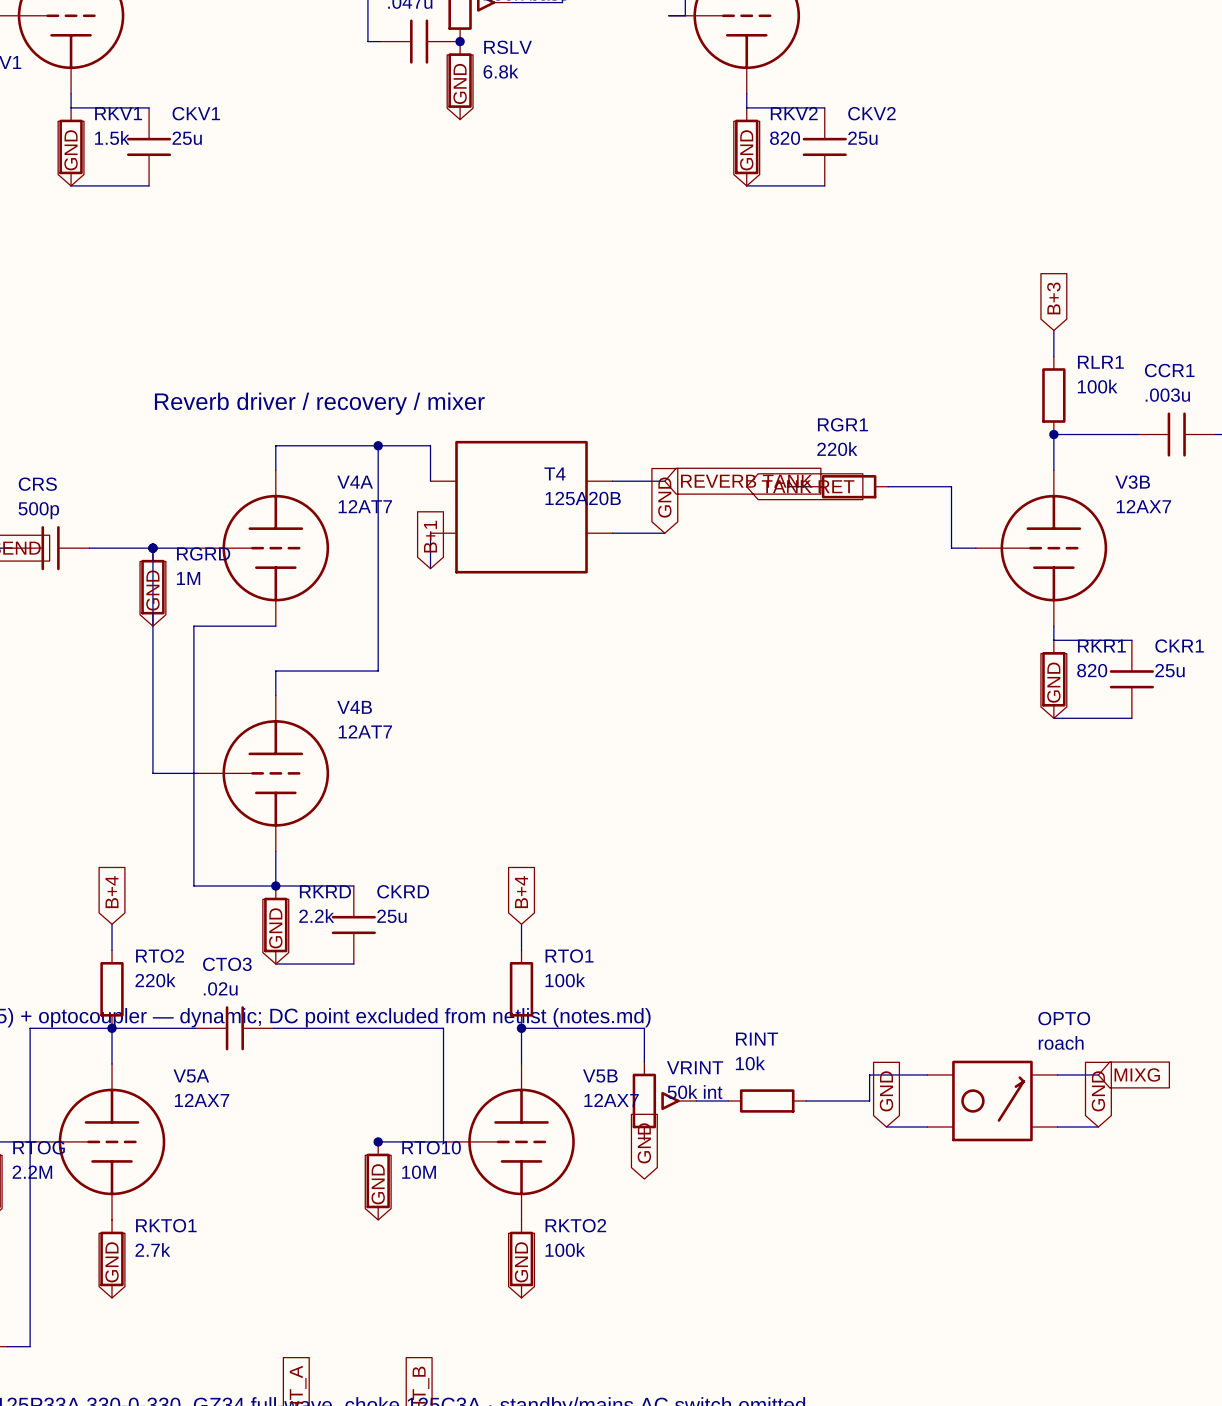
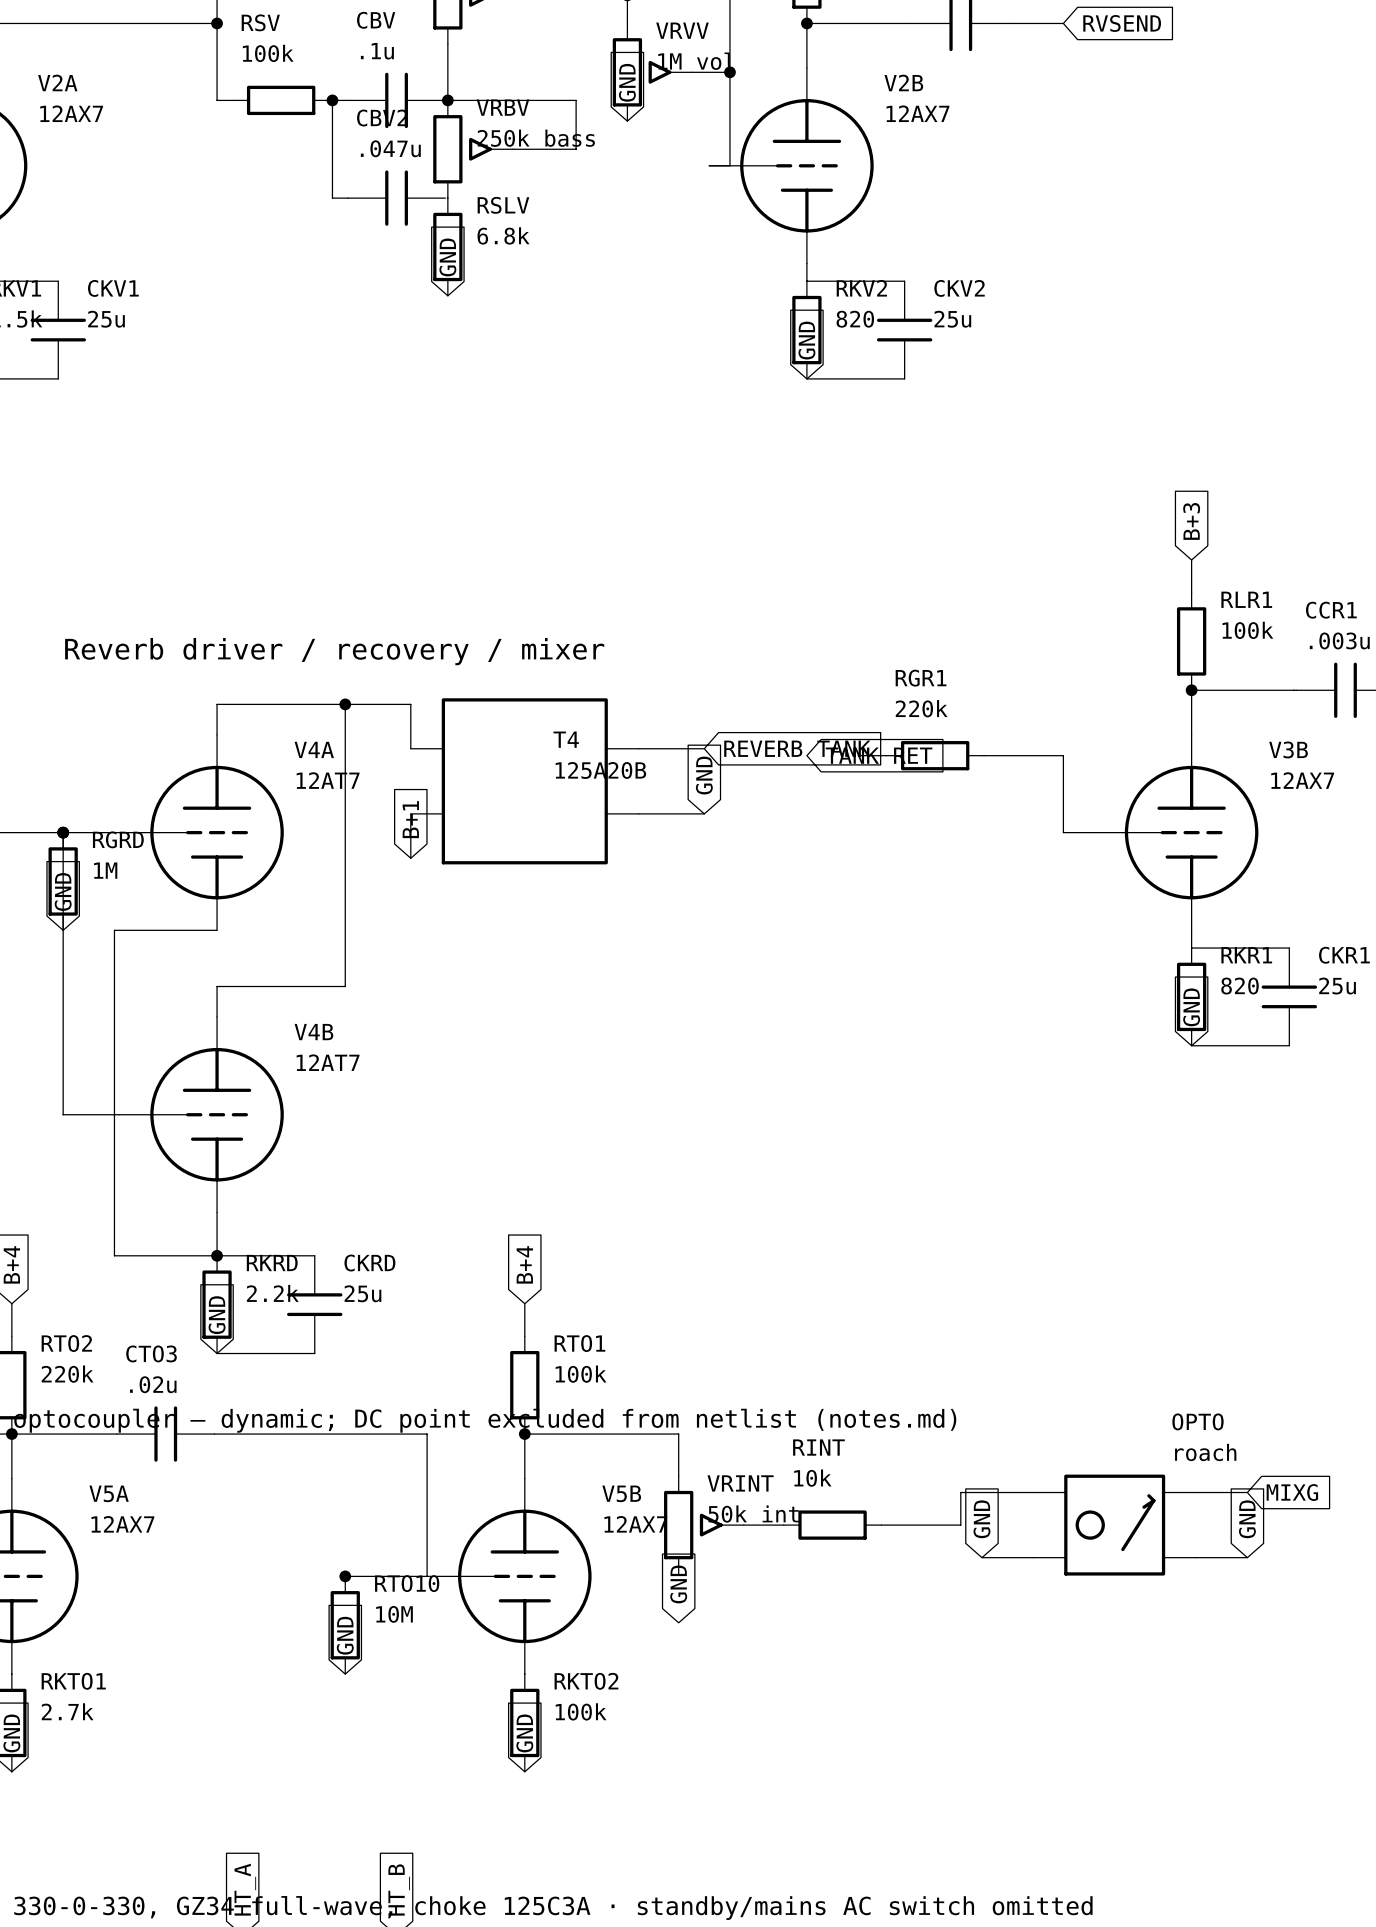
junction: (460, 41) -> none

